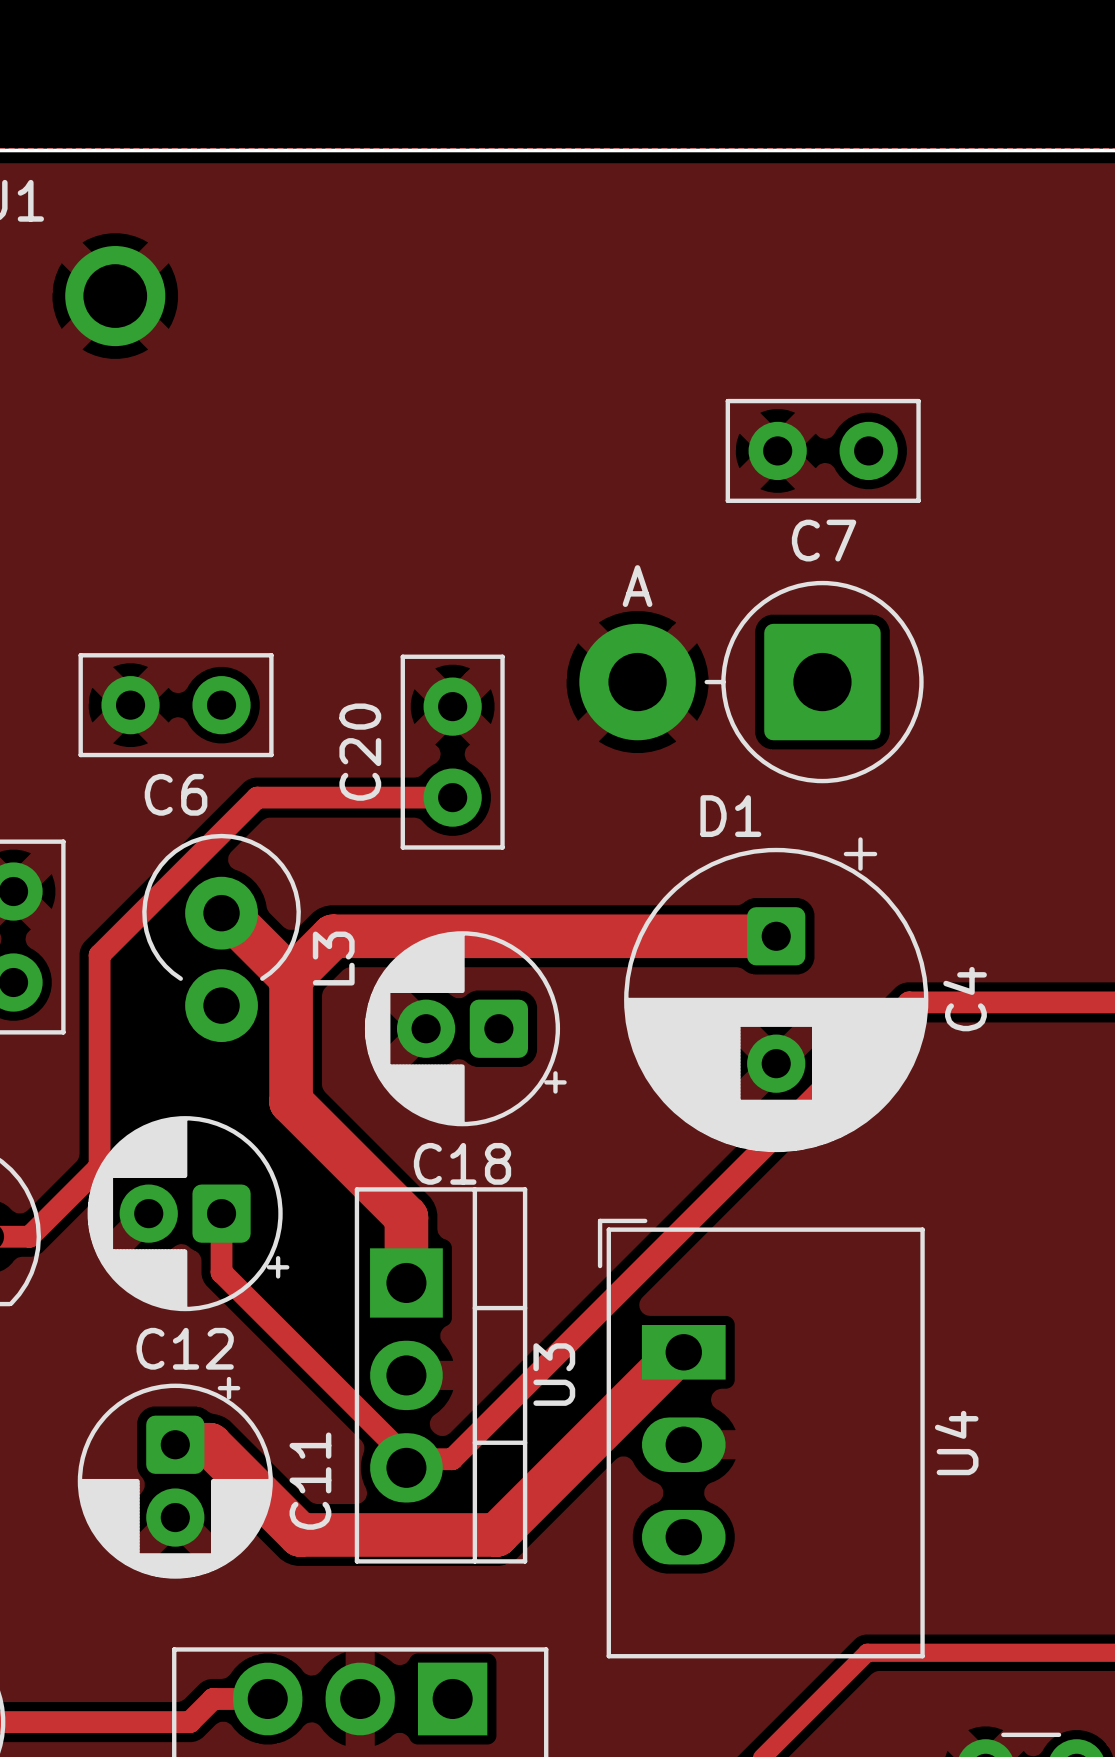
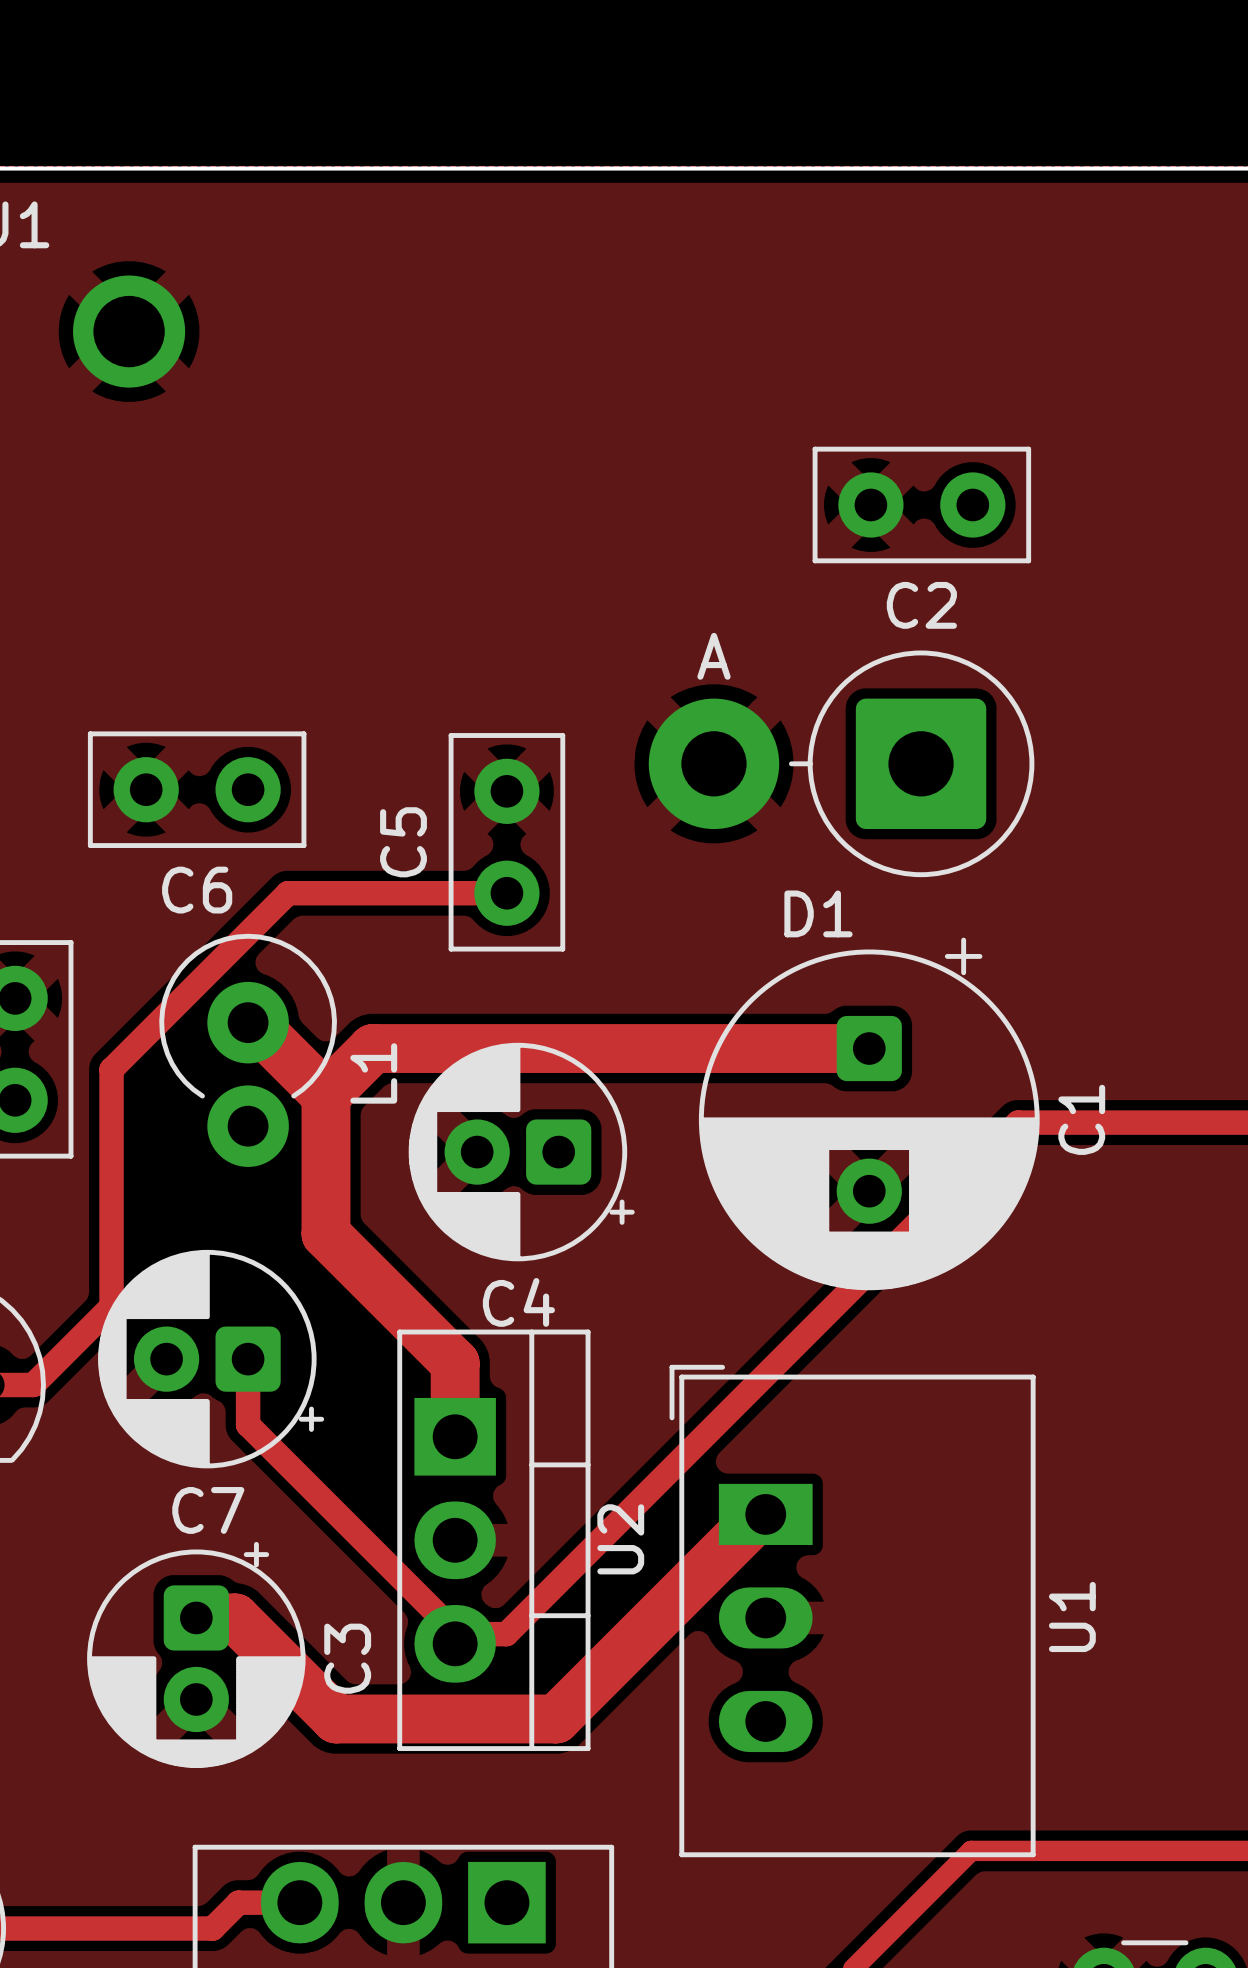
C7 name: C7 (824, 540) -> C2 (921, 605)
C20 name: C20 (360, 752) -> C5 (403, 842)
L3 name: L3 (333, 958) -> L1 (373, 1073)
C4 name: C4 (965, 999) -> C1 (1081, 1119)
C18 name: C18 (462, 1163) -> C4 (518, 1302)
C12 name: C12 (185, 1348) -> C7 (208, 1510)
U3 name: U3 (554, 1374) -> U2 (620, 1539)
U4 name: U4 (956, 1443) -> U1 (1072, 1616)
C11 name: C11 (310, 1481) -> C3 (347, 1658)

